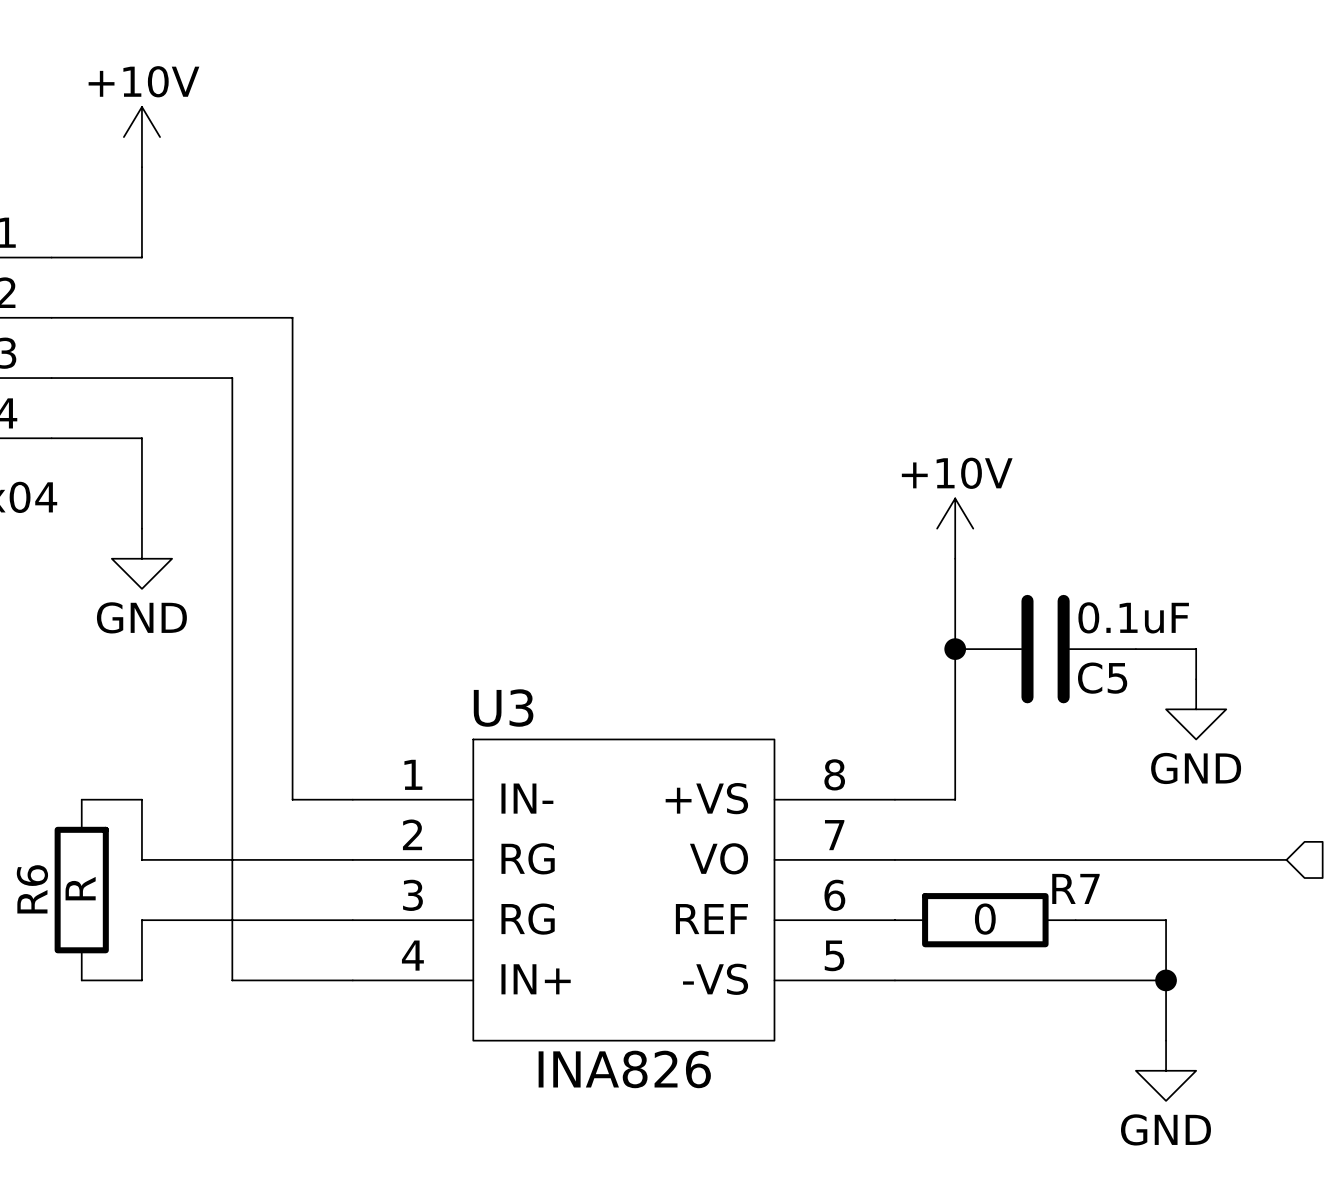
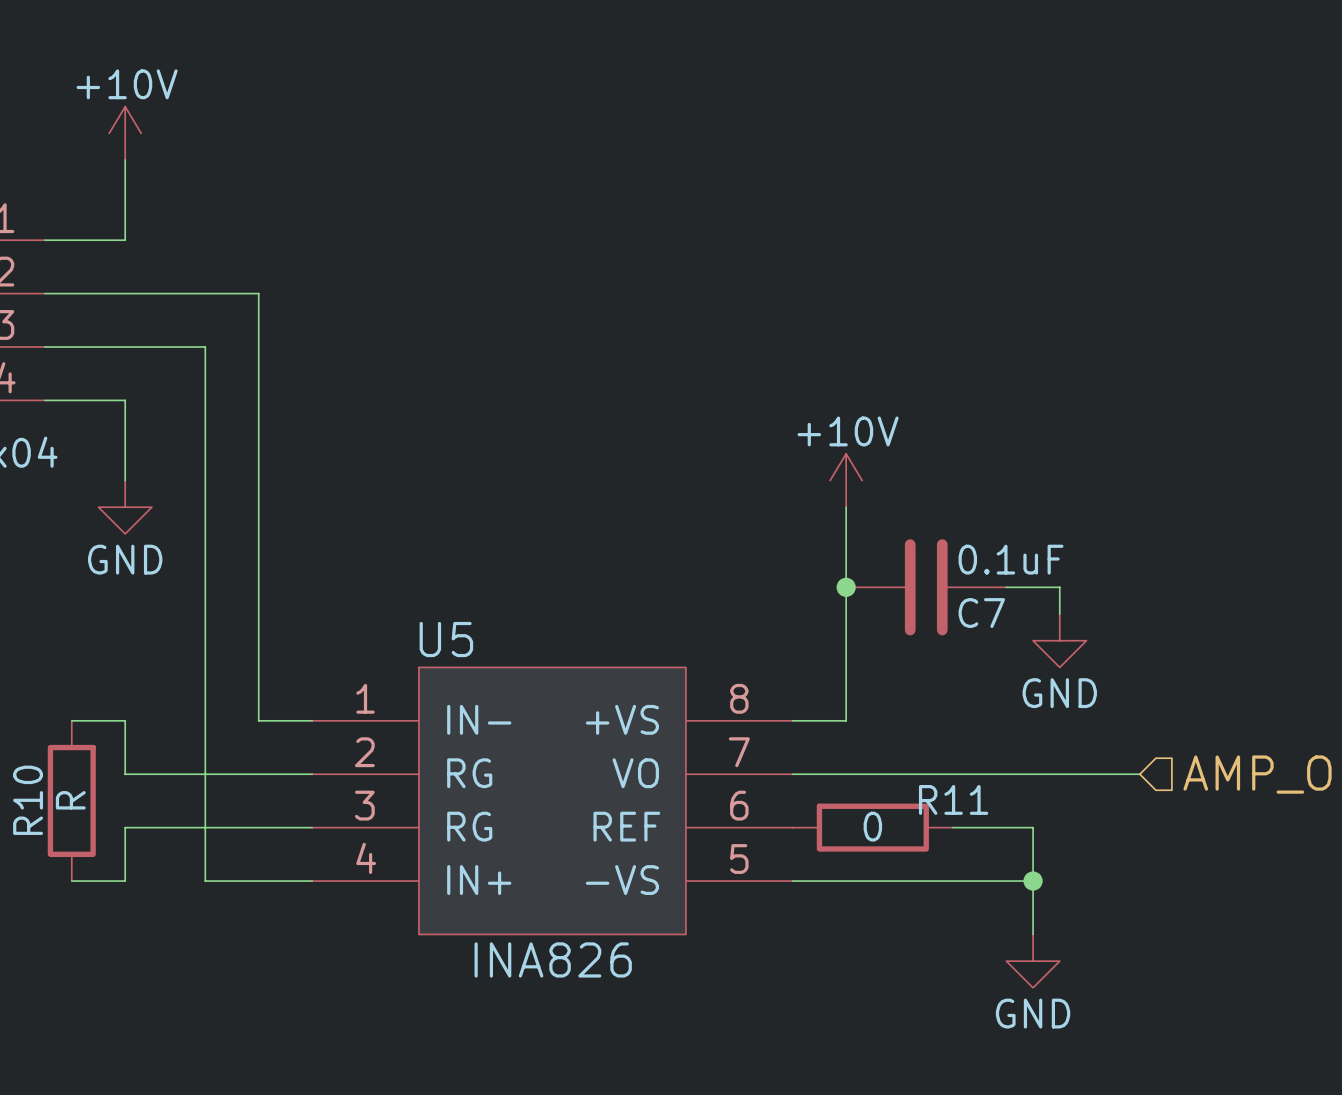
C5 name: C5 (1102, 678) -> C7 (981, 613)
U3 name: U3 (503, 708) -> U5 (446, 639)
R7 name: R7 (1075, 888) -> R11 (953, 799)
R6 name: R6 (32, 889) -> R10 (28, 800)

